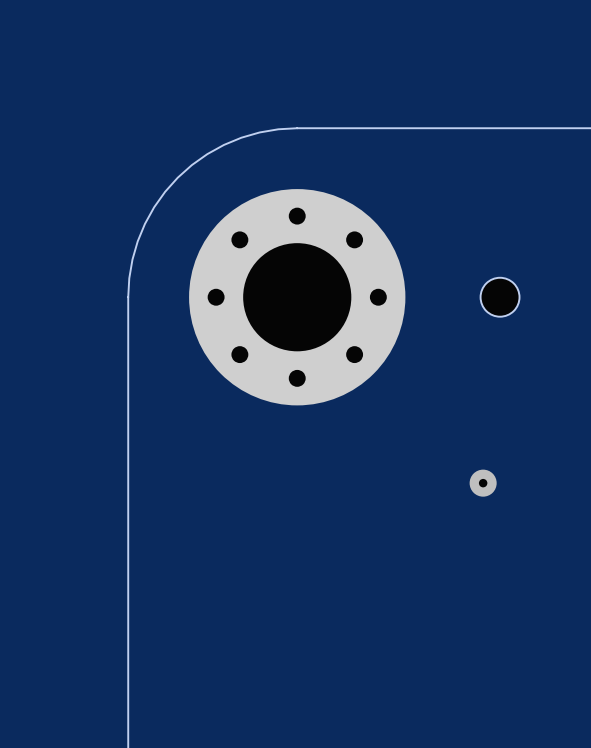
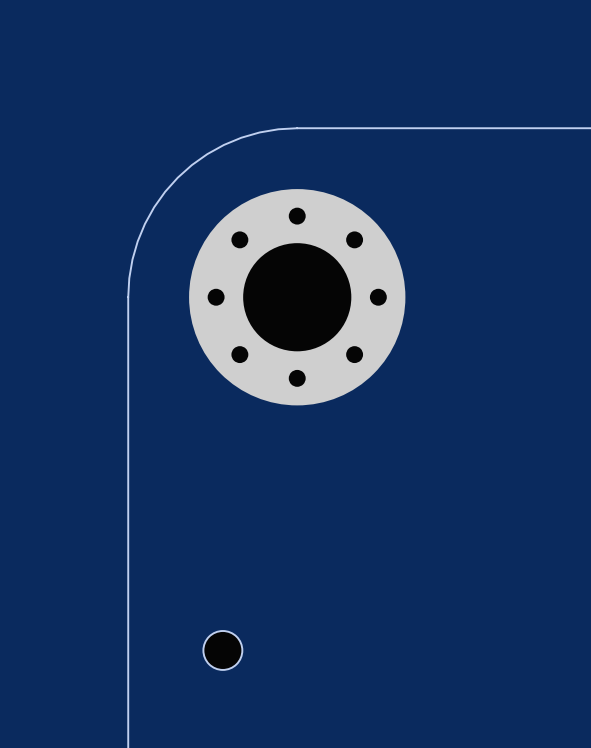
part position: (500, 297) -> (222, 650)
via: (483, 483) -> none

